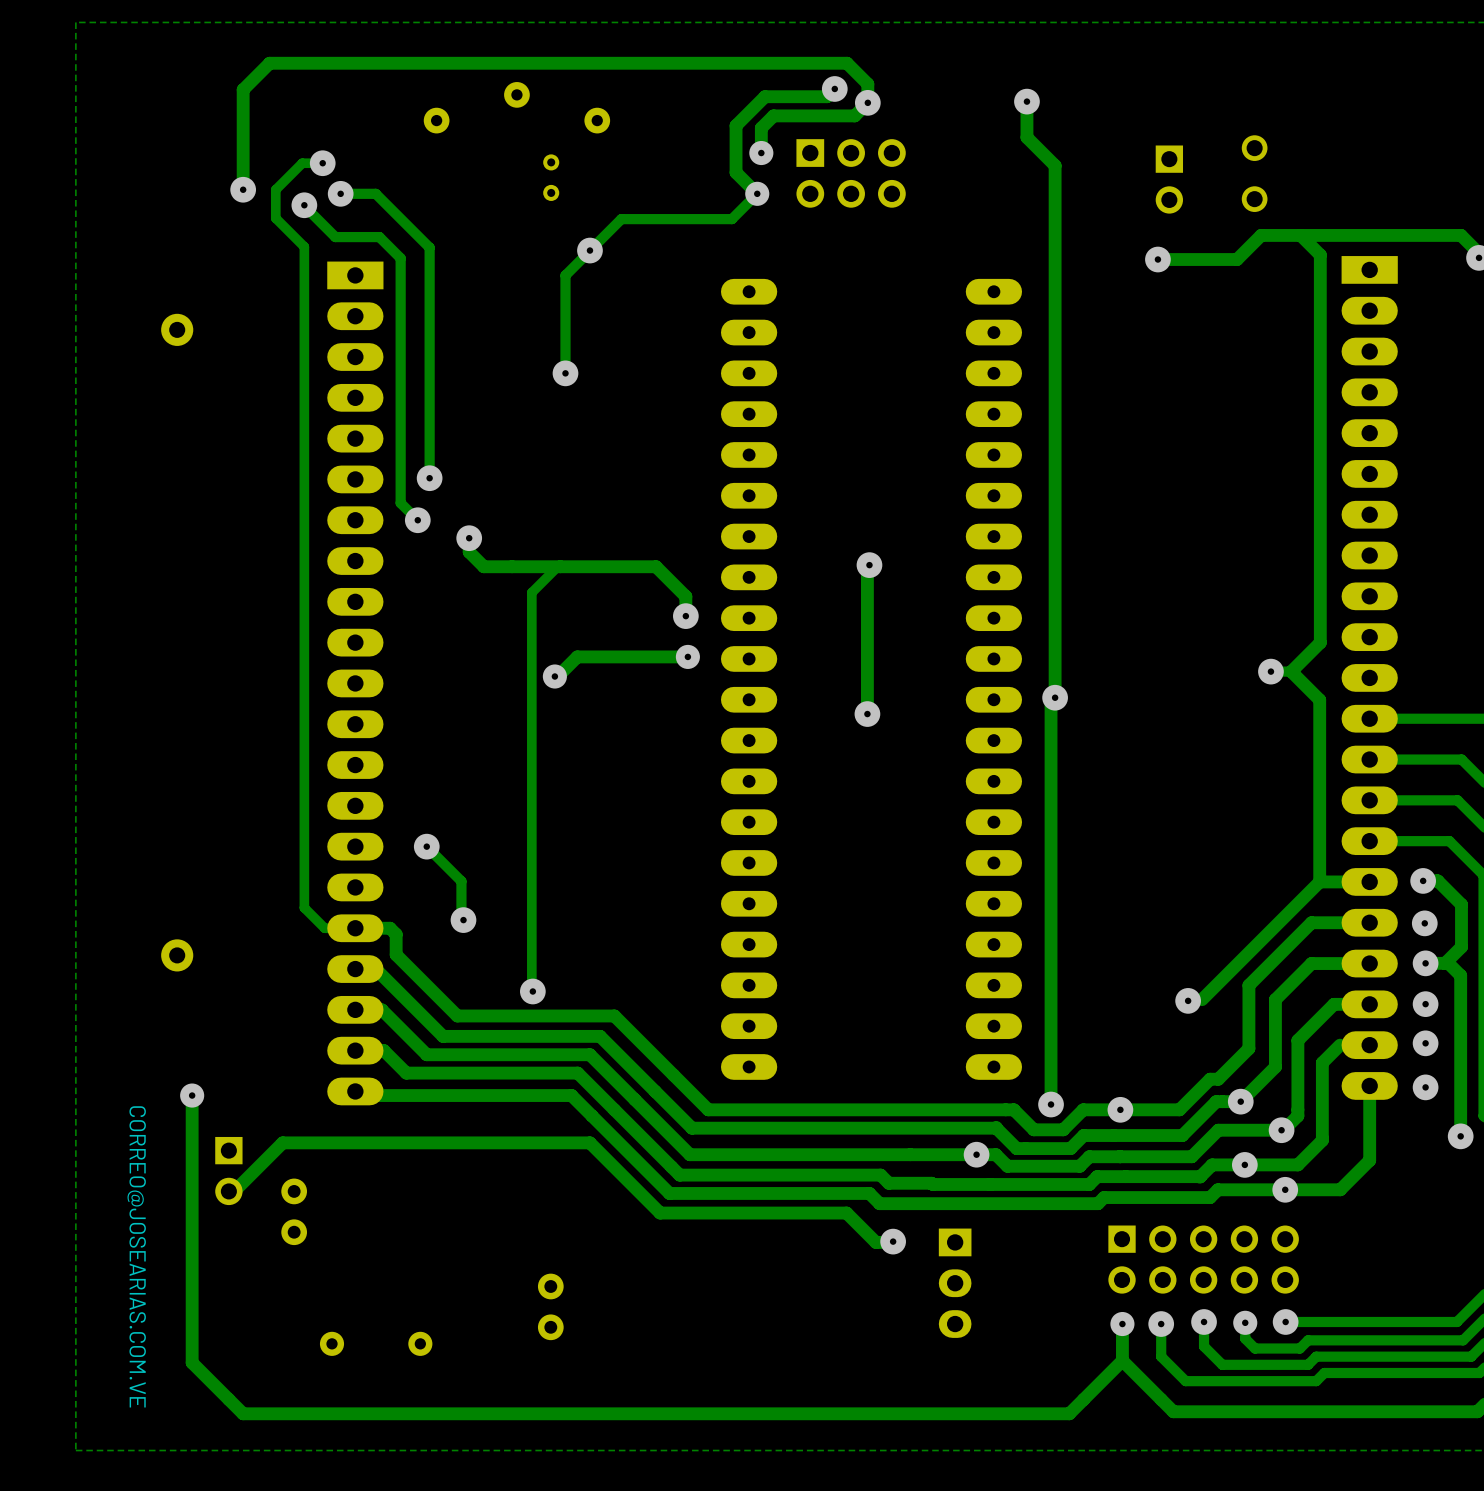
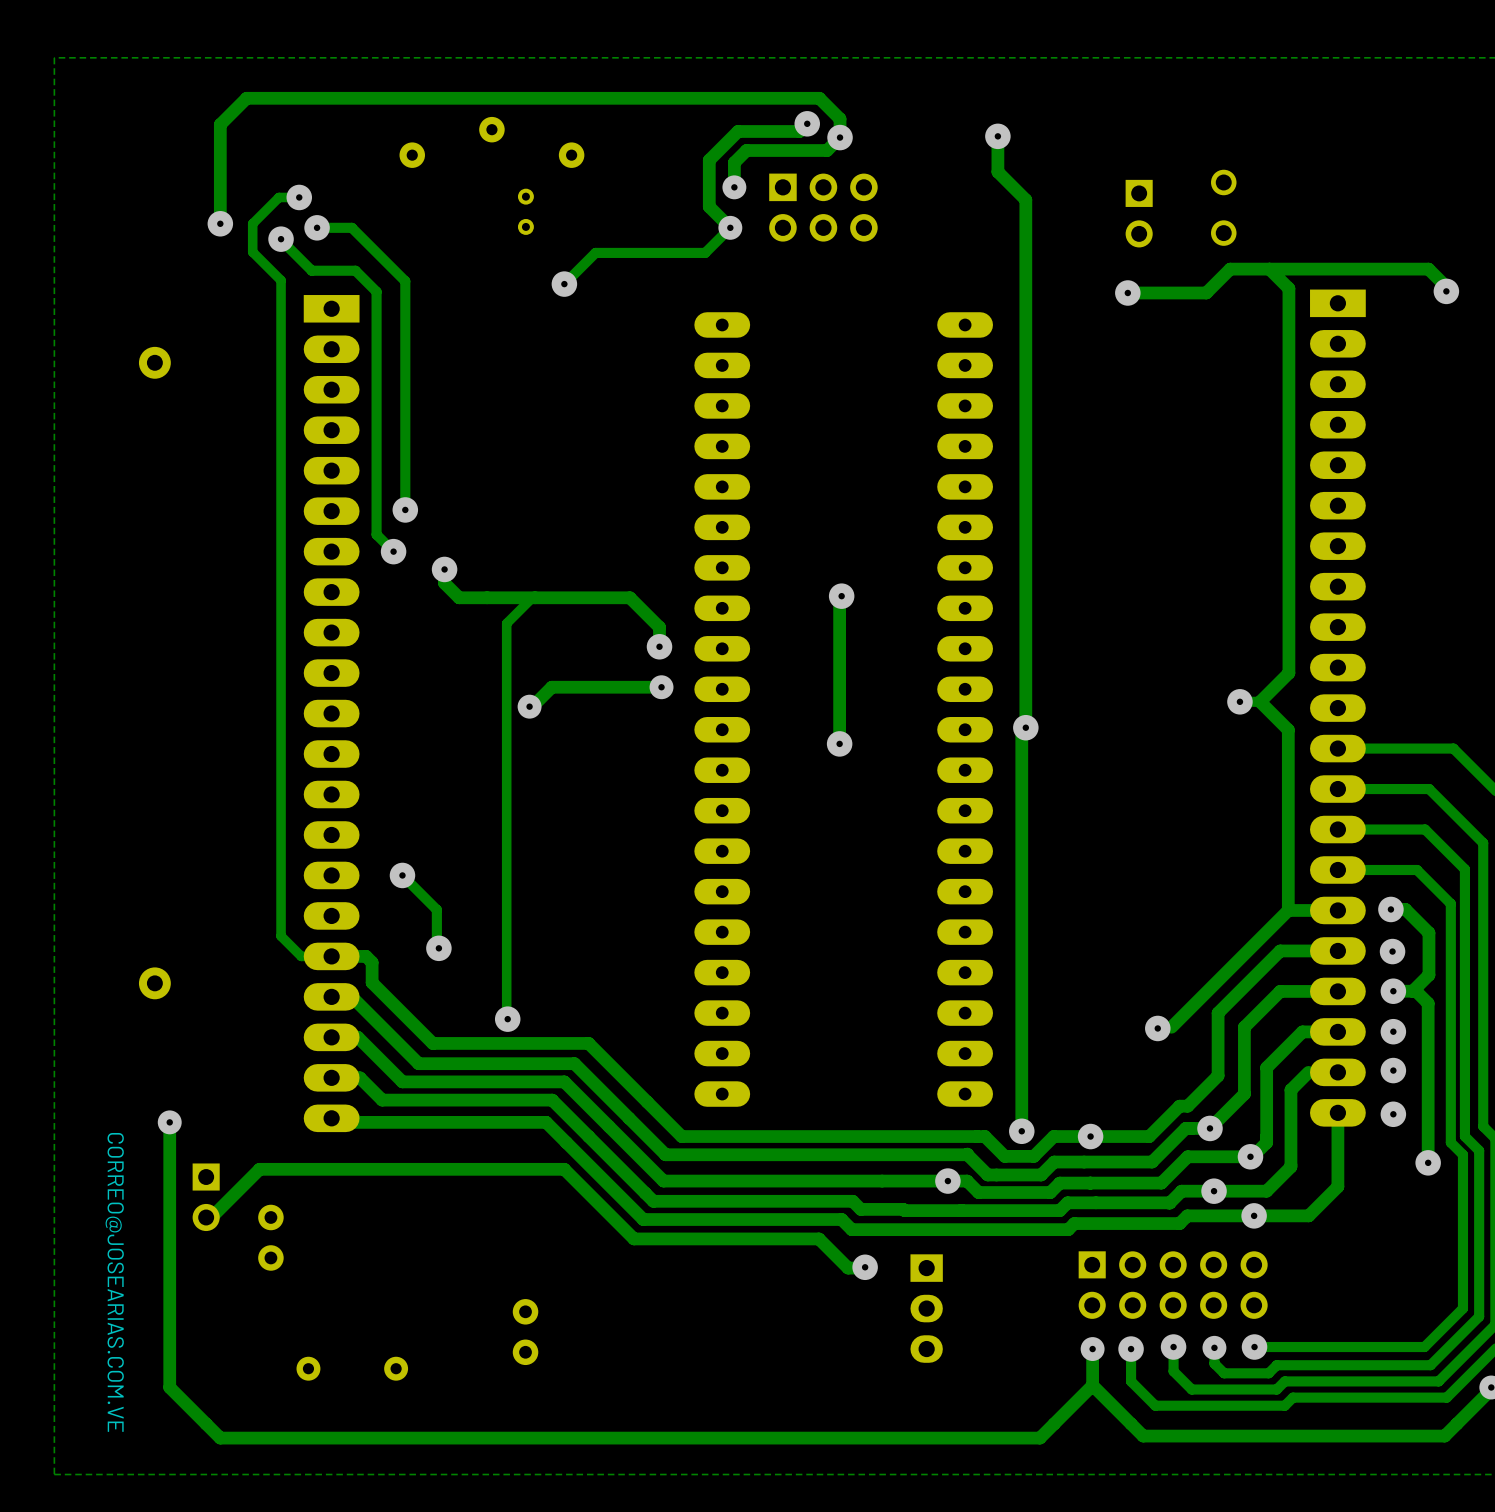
track: (589, 250) (565, 275) (565, 373) -> none
via: (565, 373) -> none

